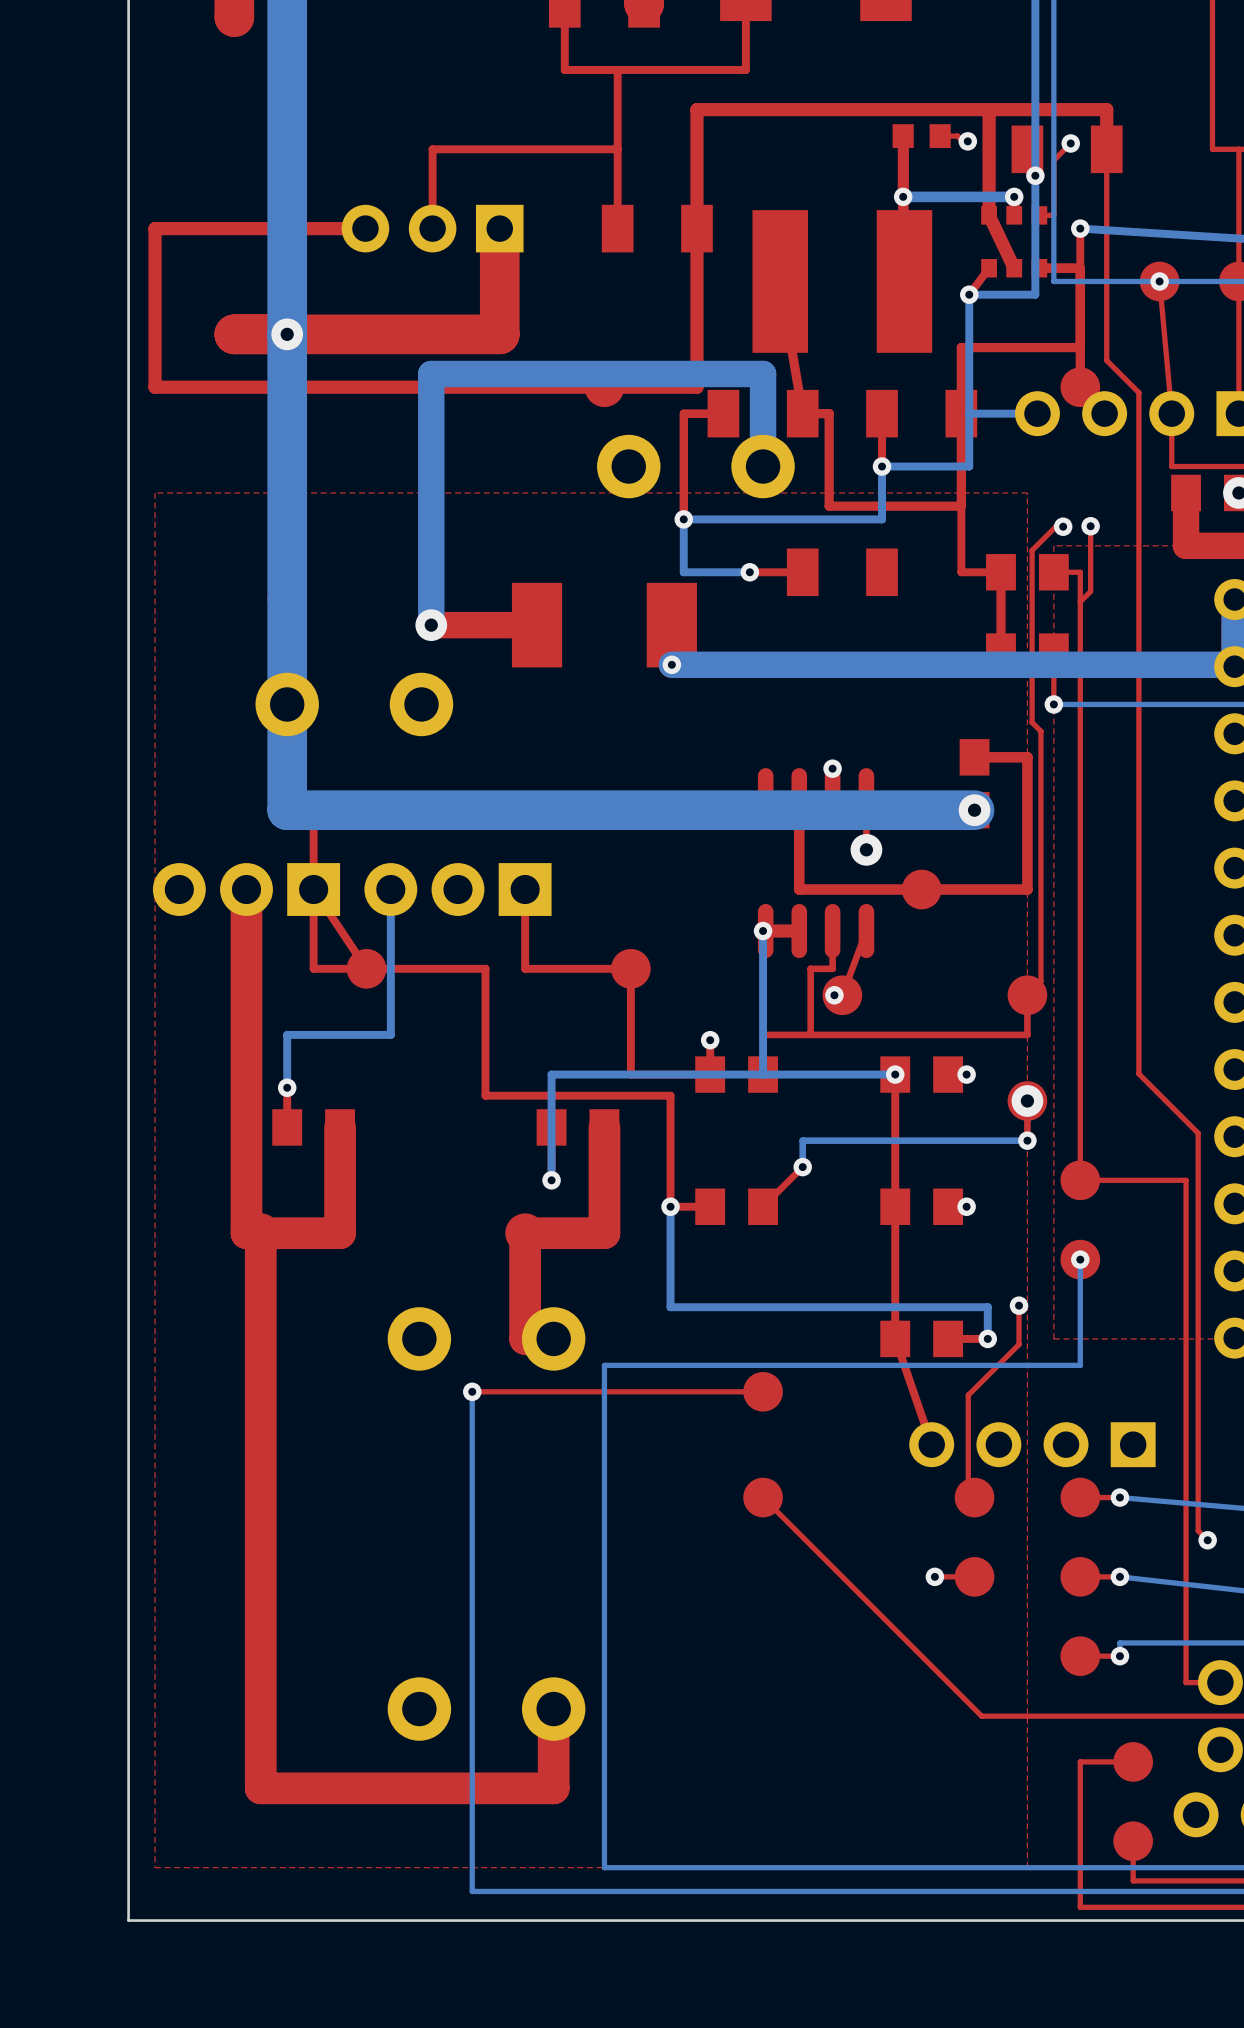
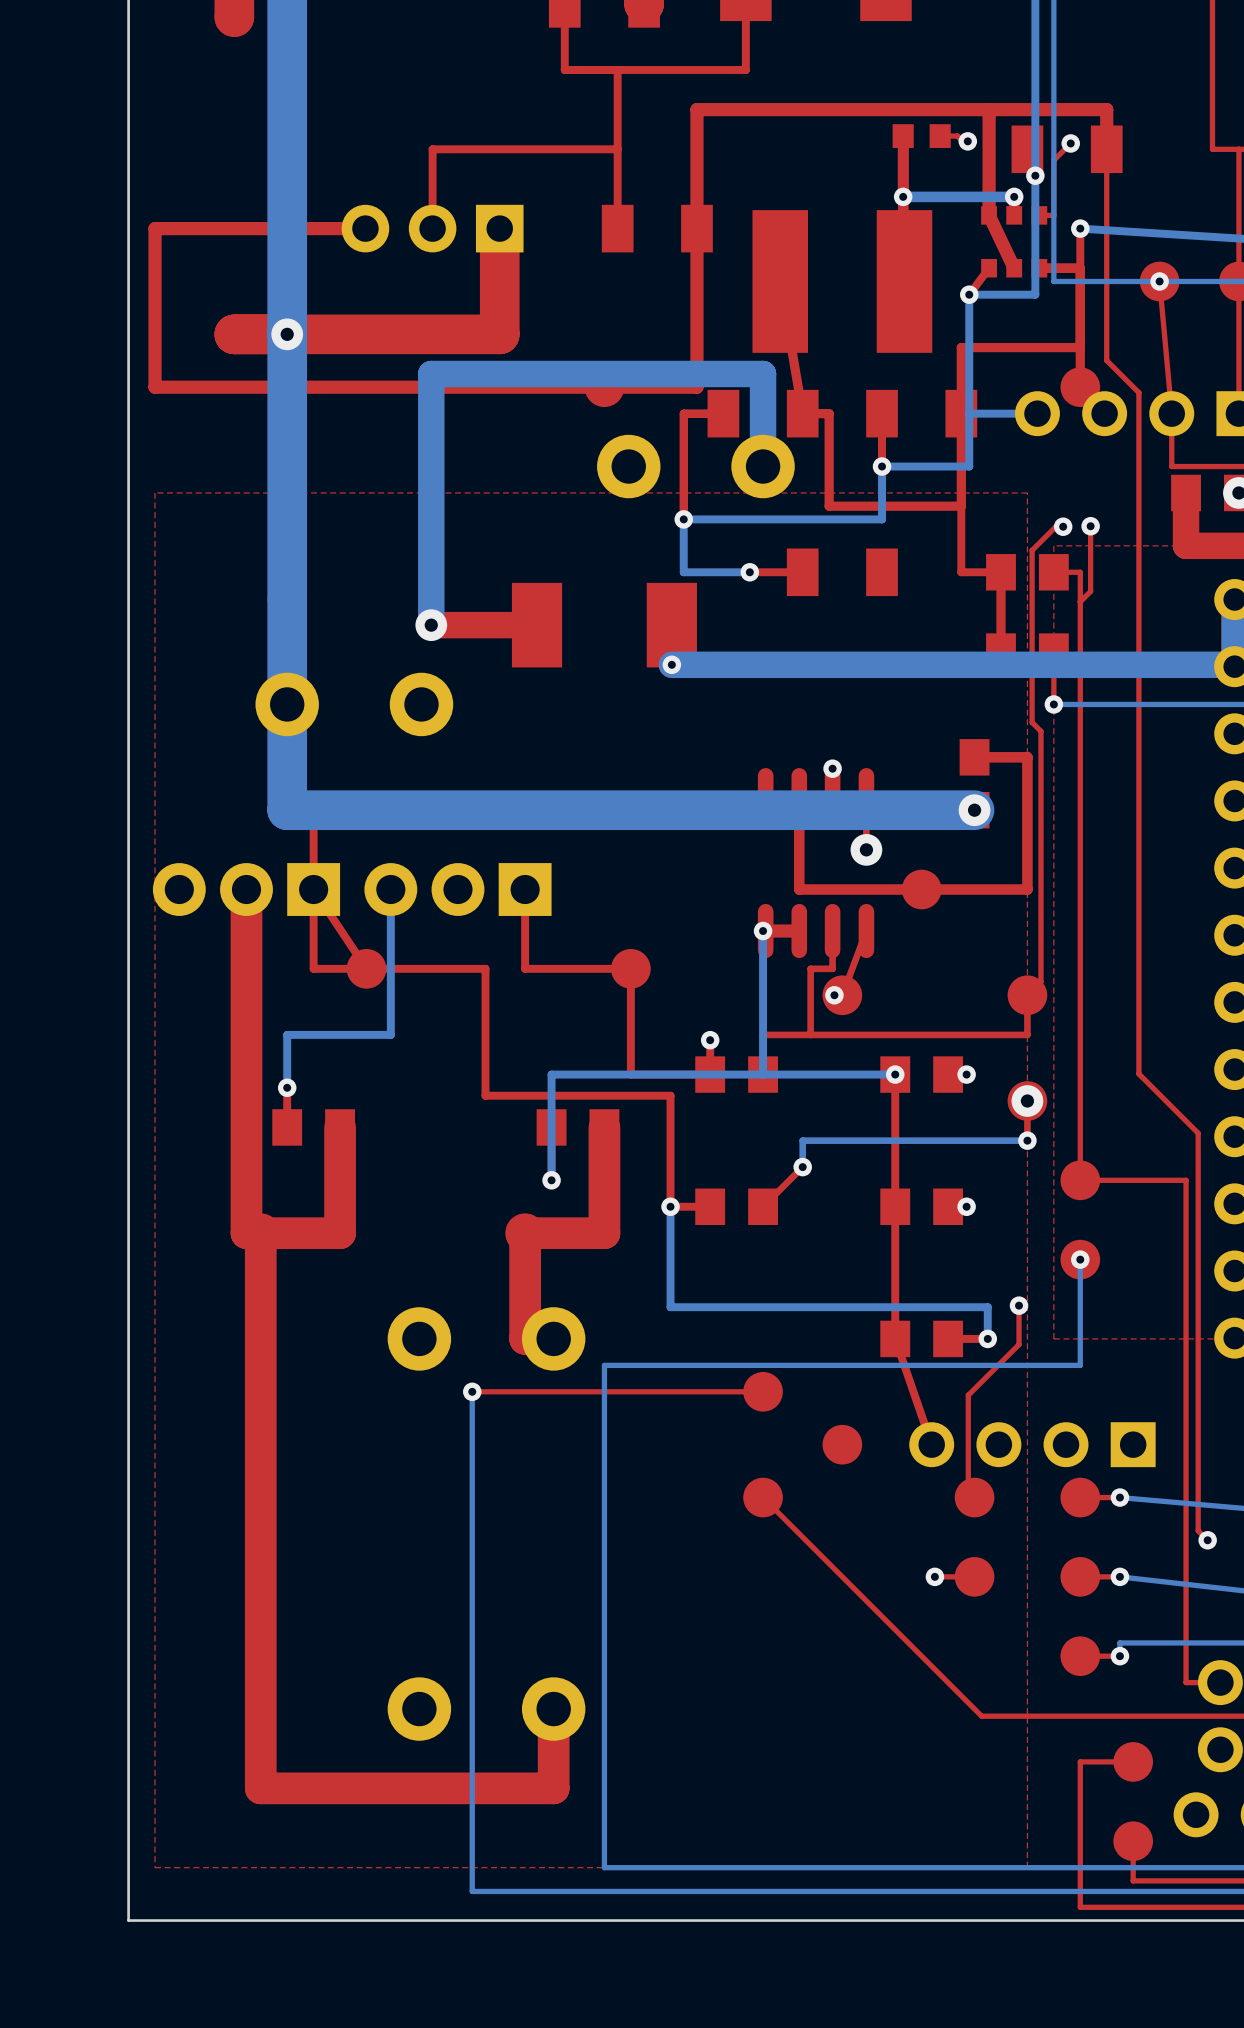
part: none -> (842, 1444)

